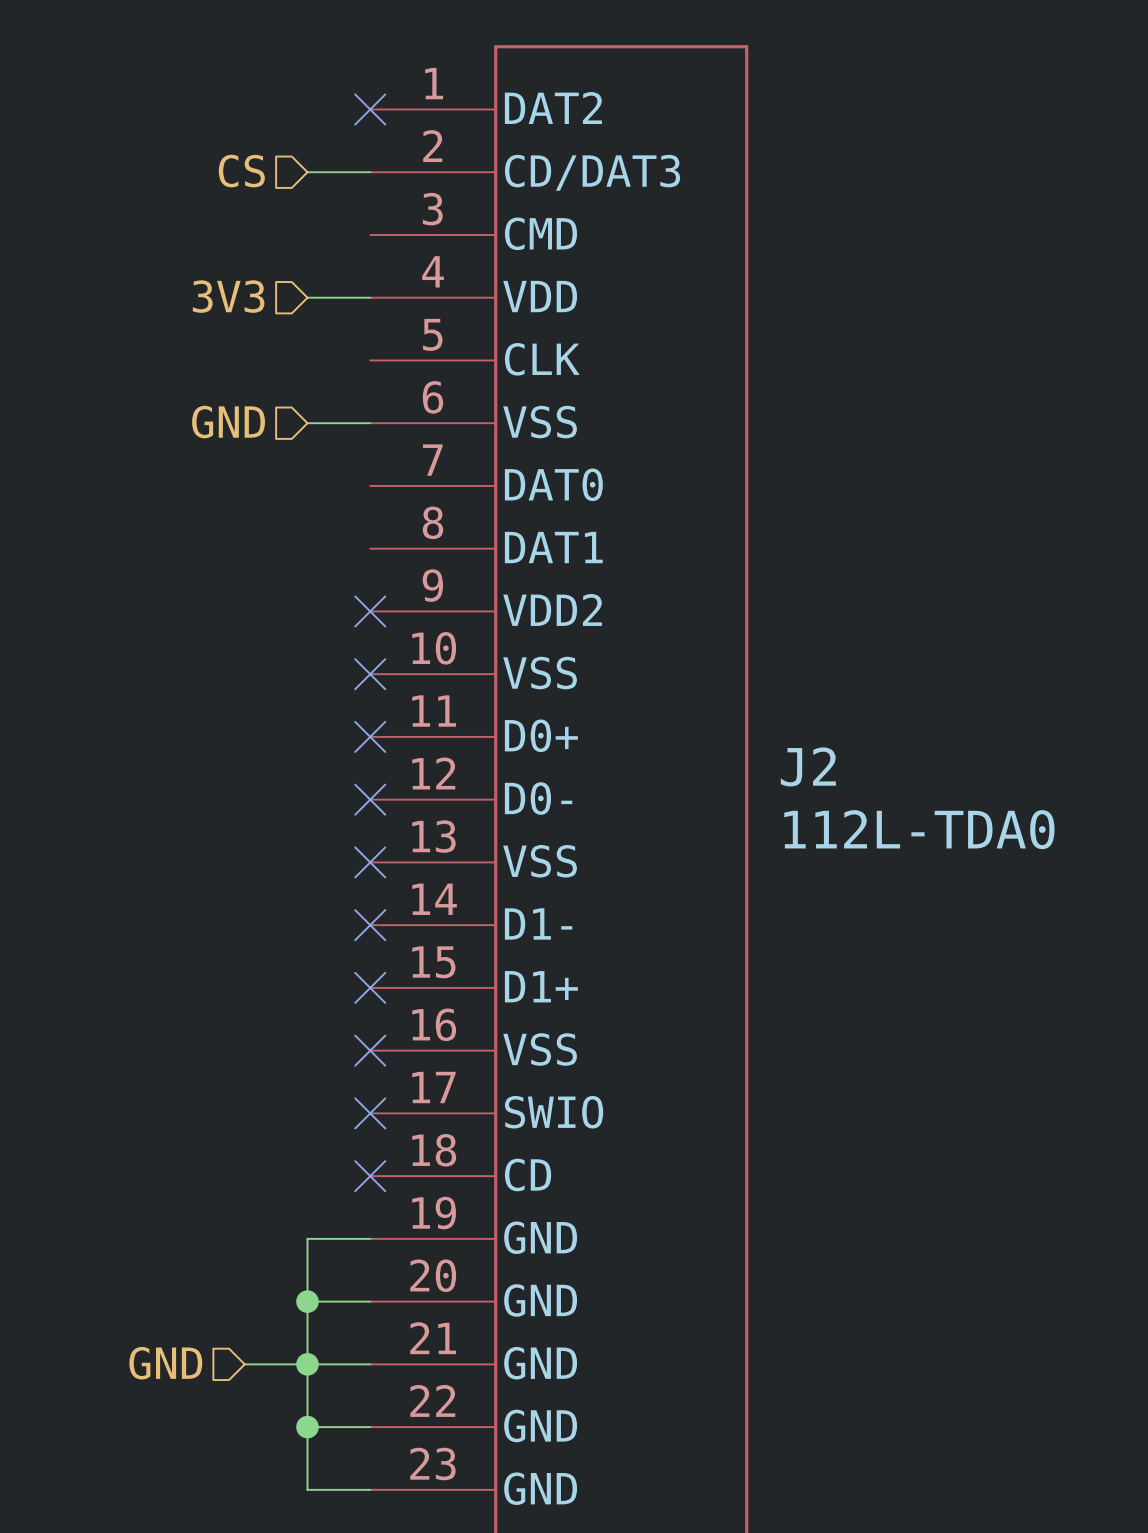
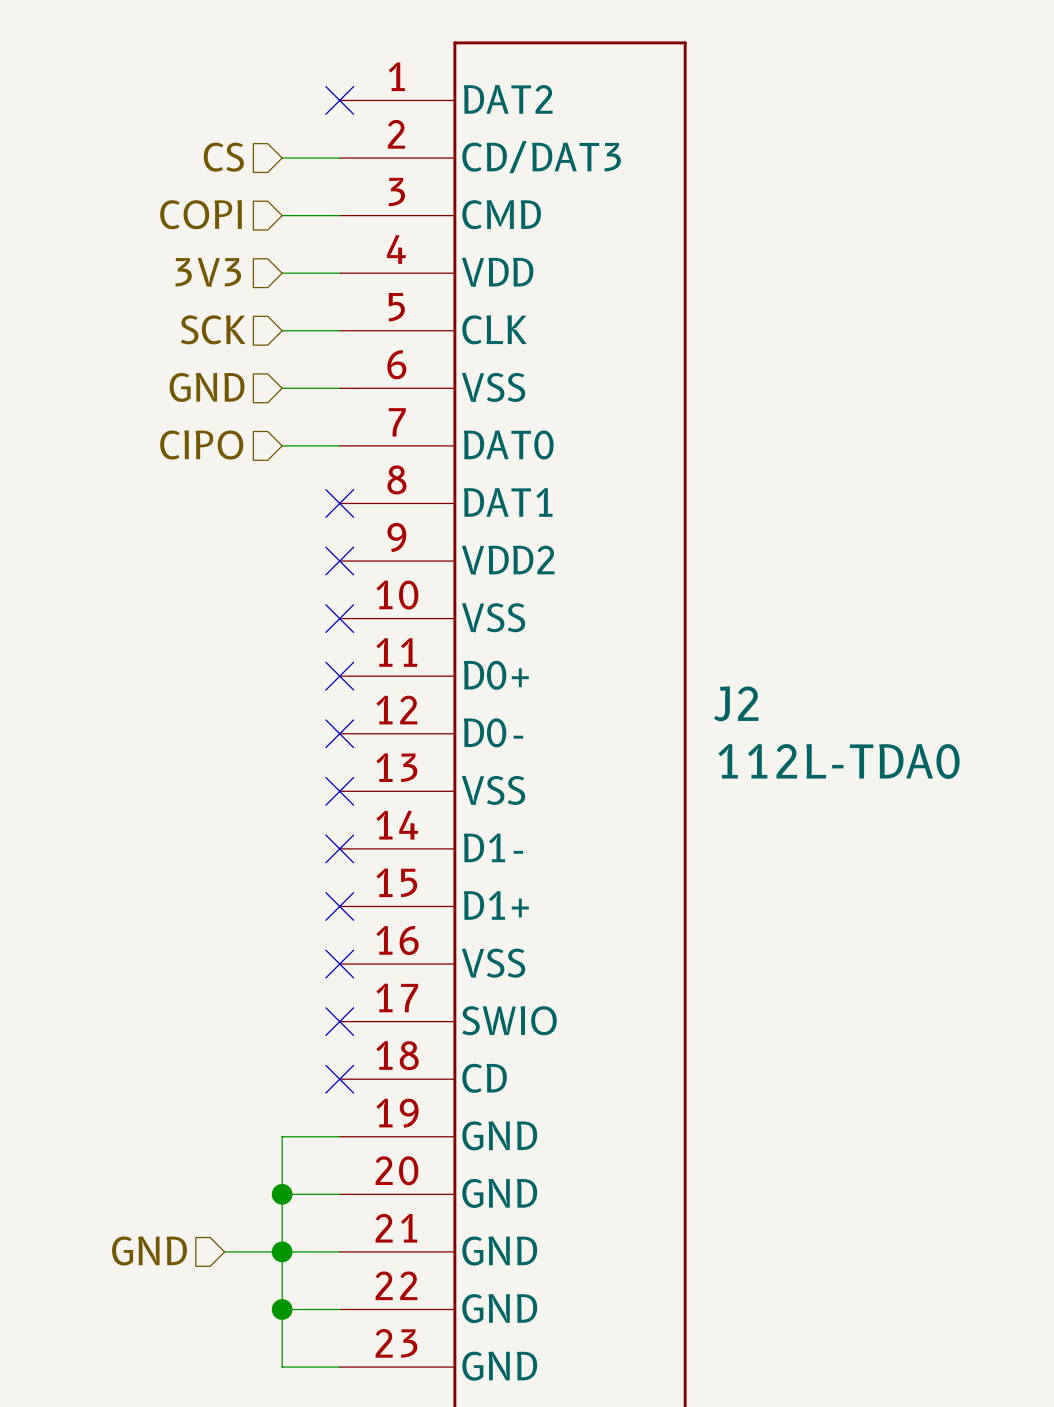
hierarchical label: none -> COPI (200, 214)
wire: none -> (282, 215) (339, 215)
hierarchical label: none -> SCK (213, 329)
wire: none -> (282, 330) (339, 330)
hierarchical label: none -> CIPO (201, 444)
wire: none -> (282, 445) (339, 445)
no-connect mark: none -> (339, 503)

